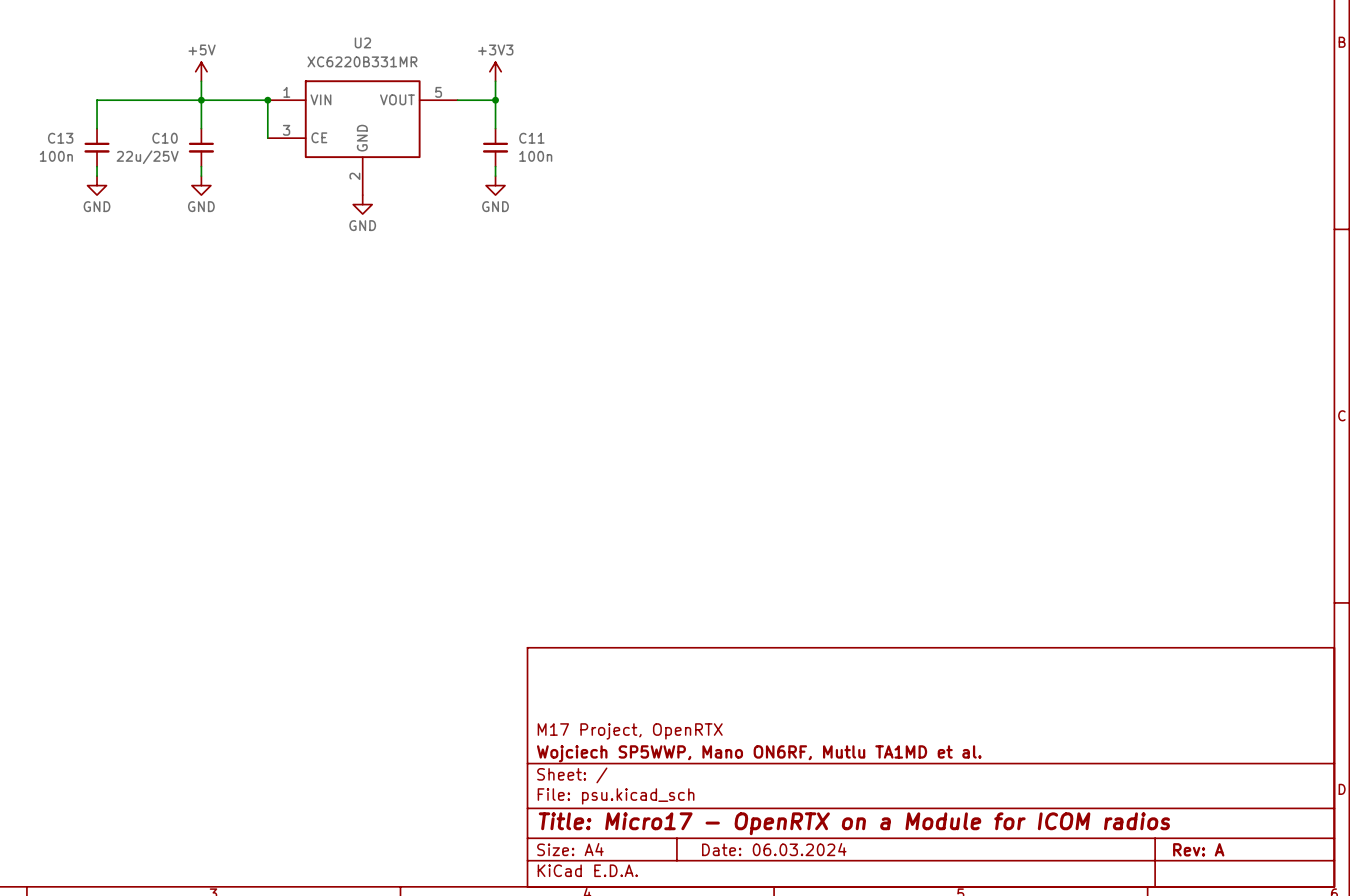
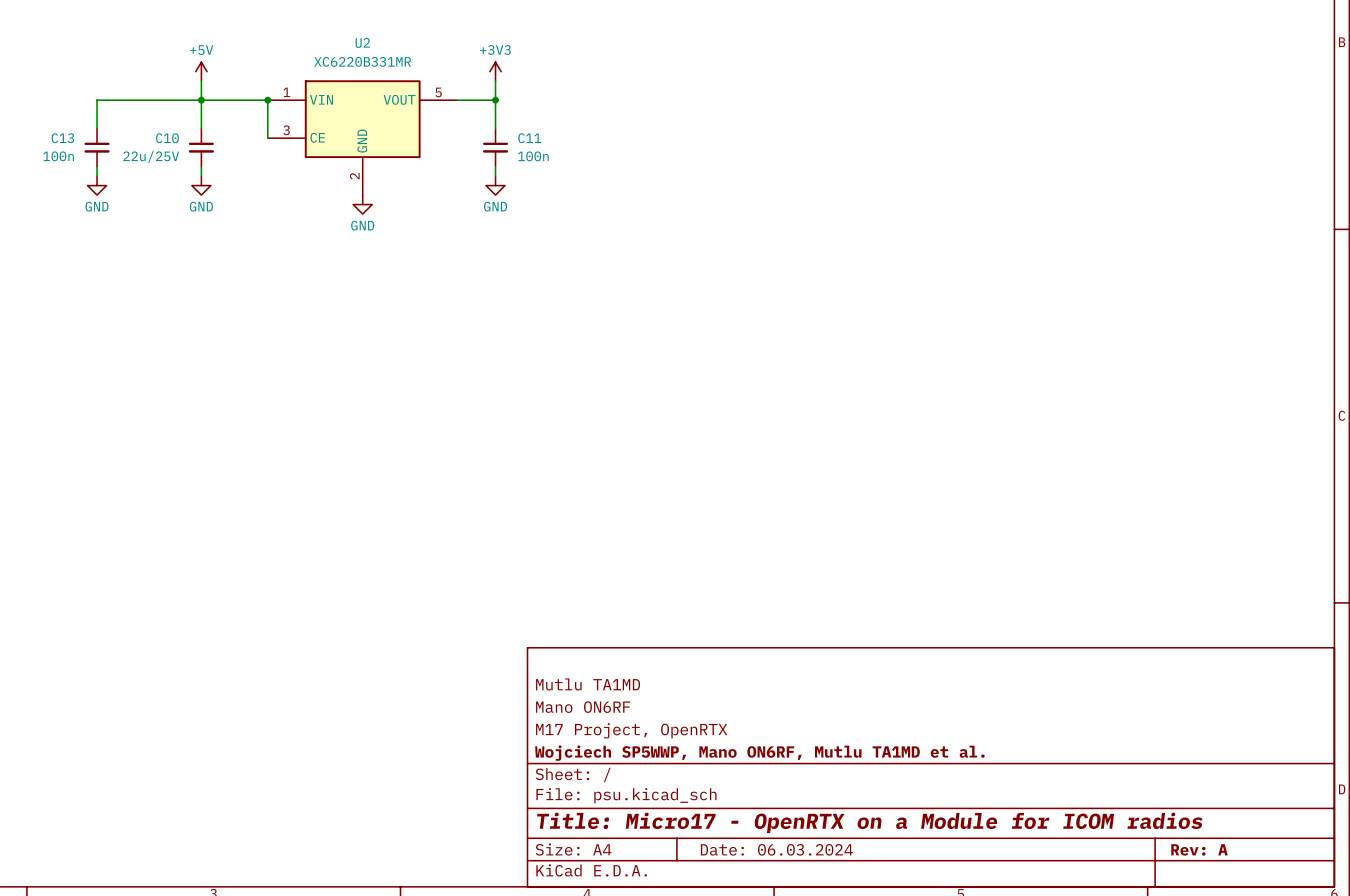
title block: none -> Mutlu TA1MD (588, 684)
title block: none -> Mano ON6RF (583, 707)

